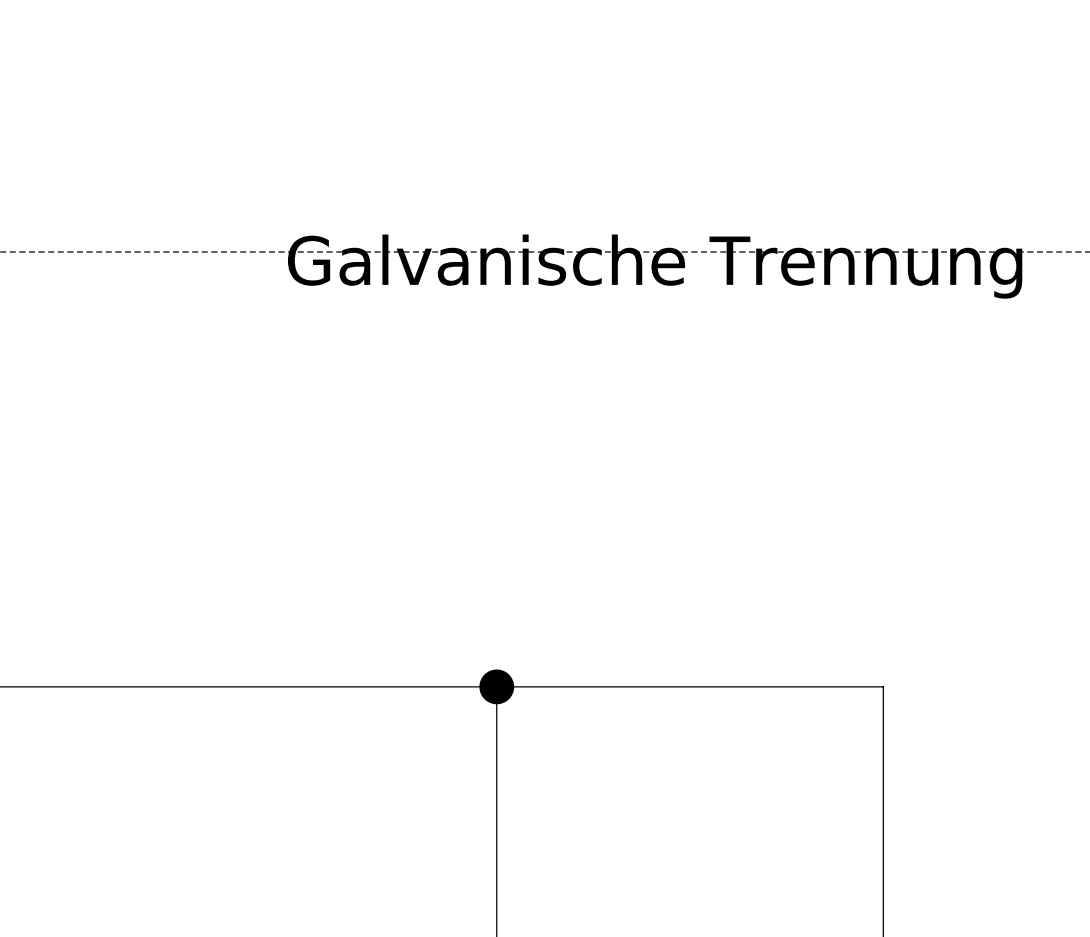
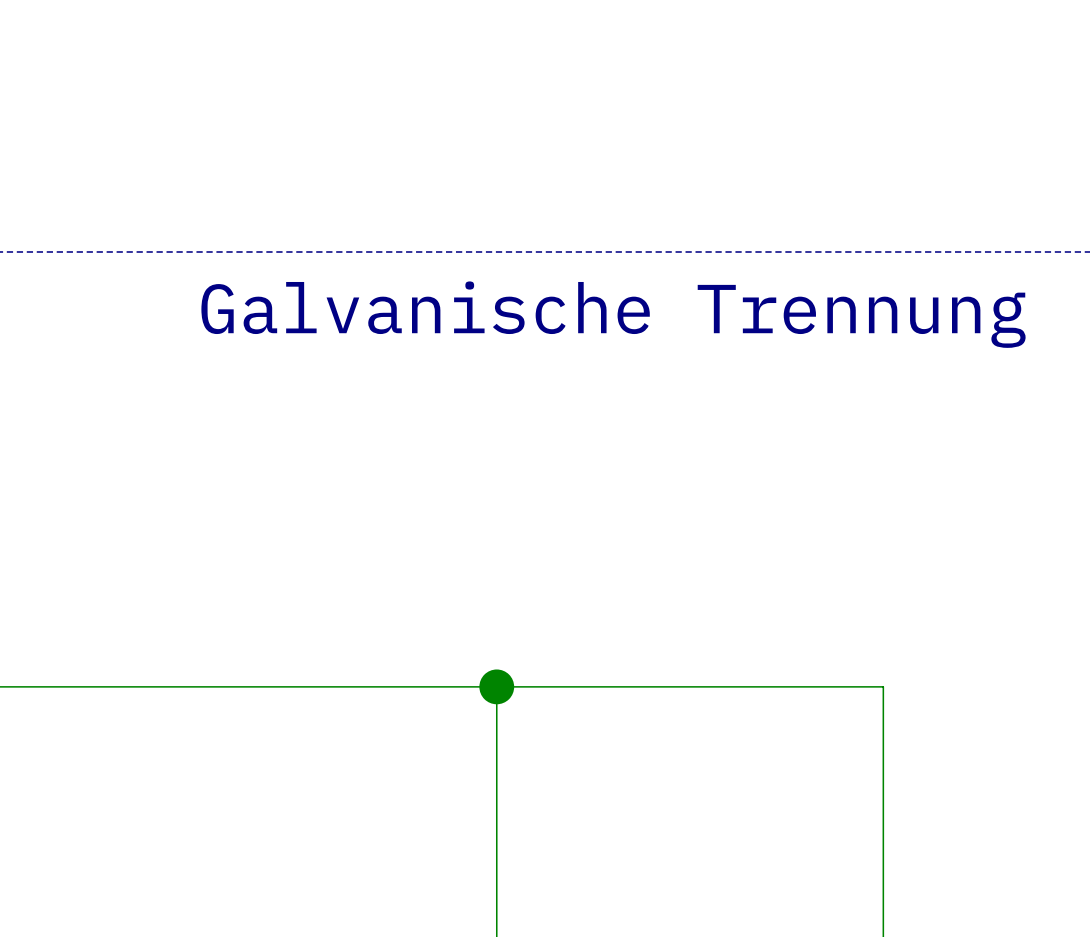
text position: Galvanische Trennung (655, 266) -> Galvanische Trennung (613, 314)

